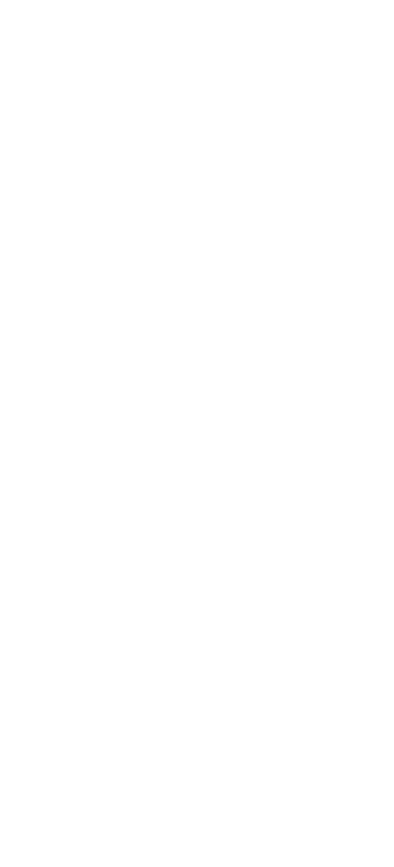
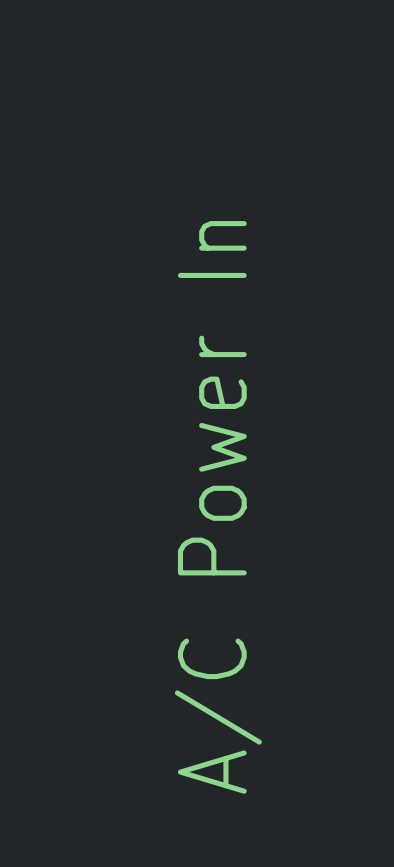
text: none -> A/C Power In (218, 507)

